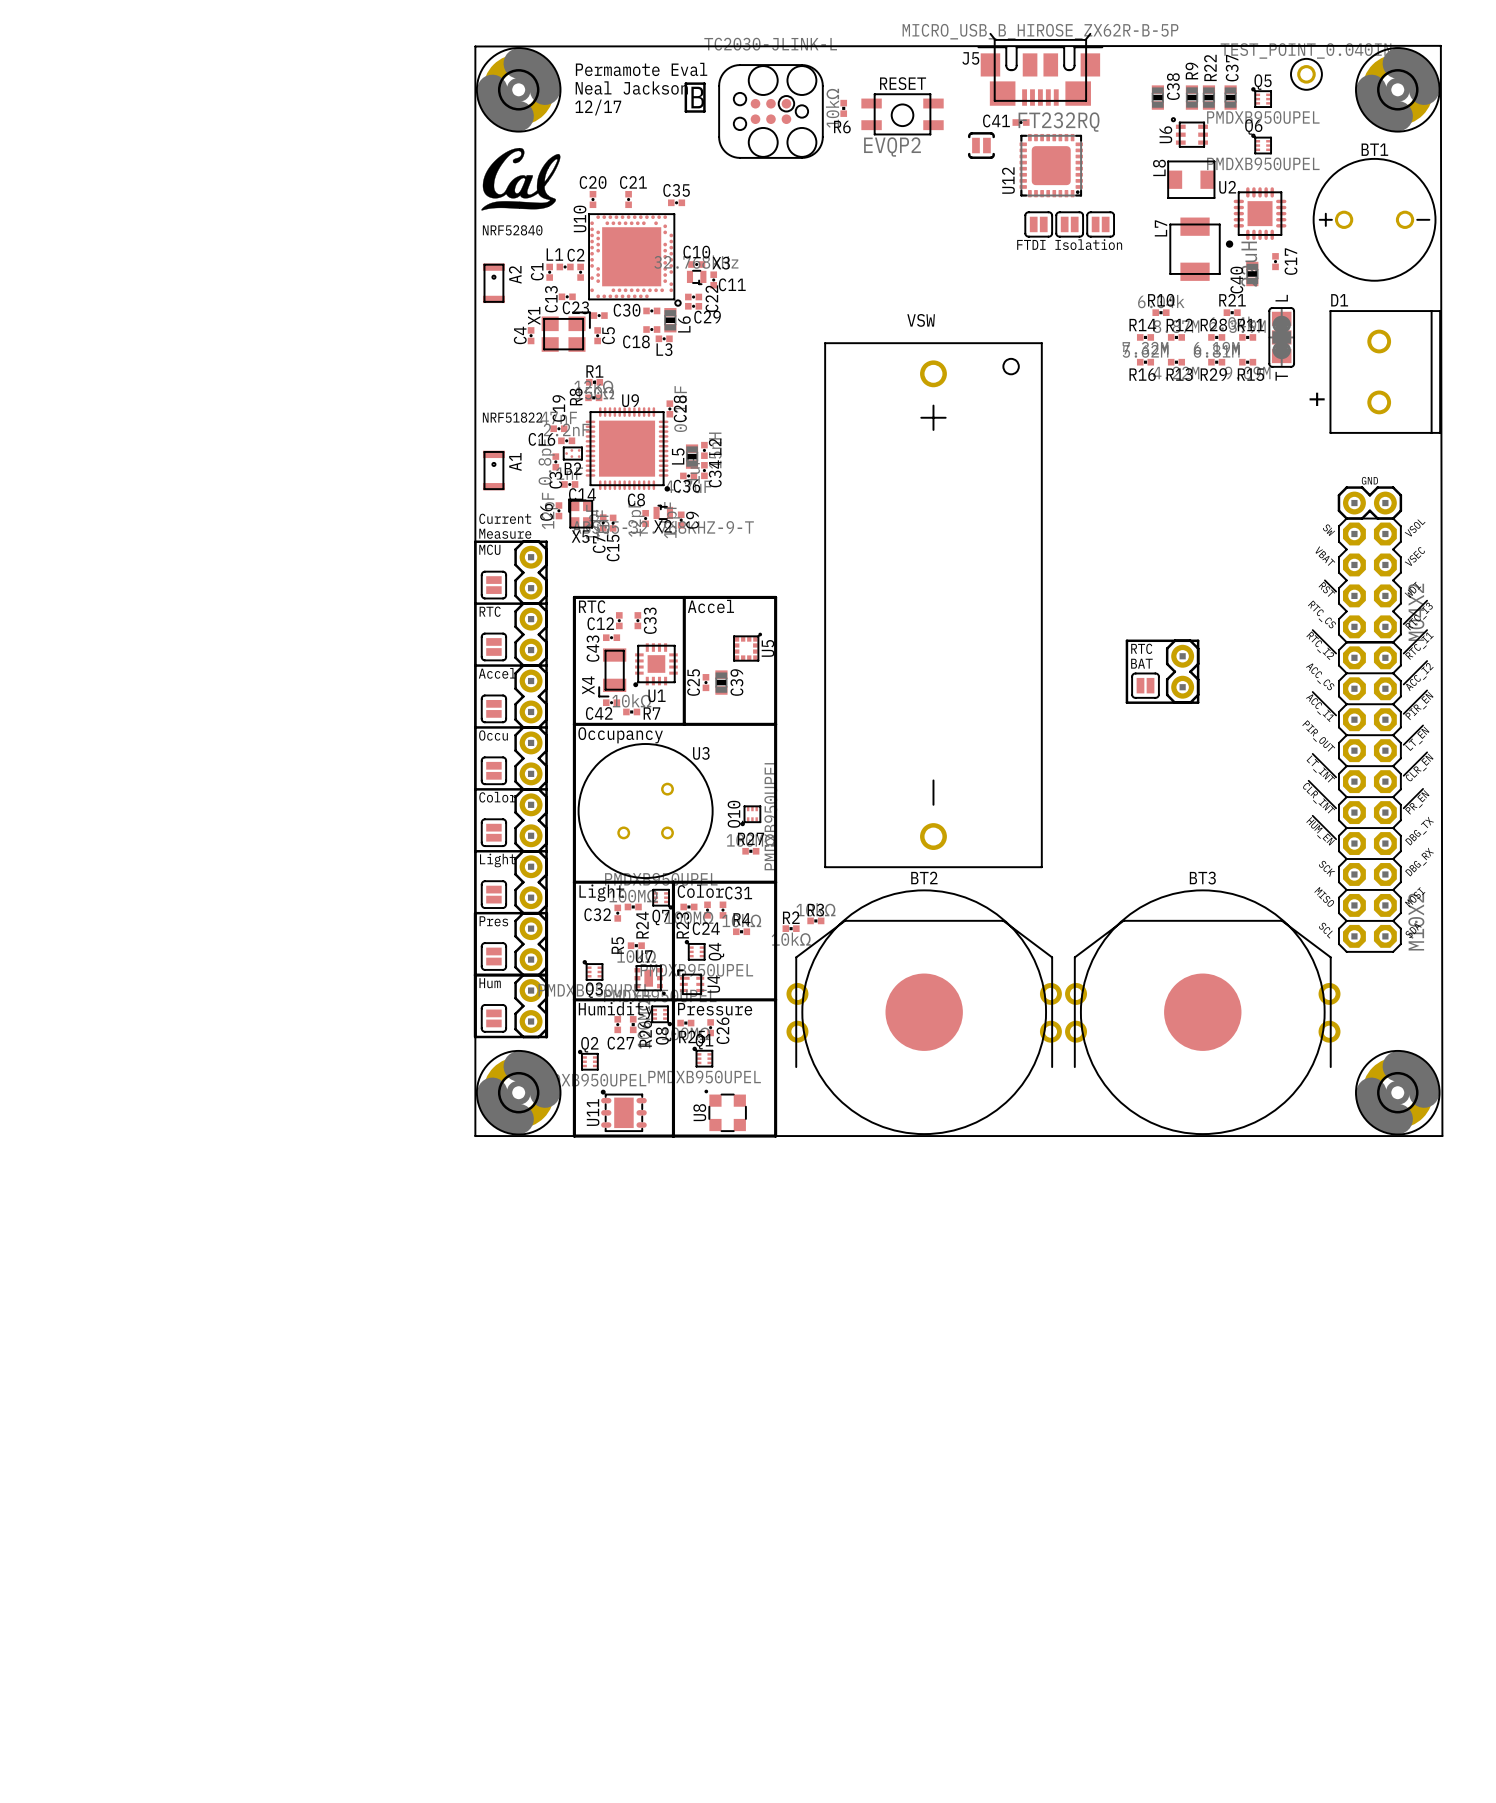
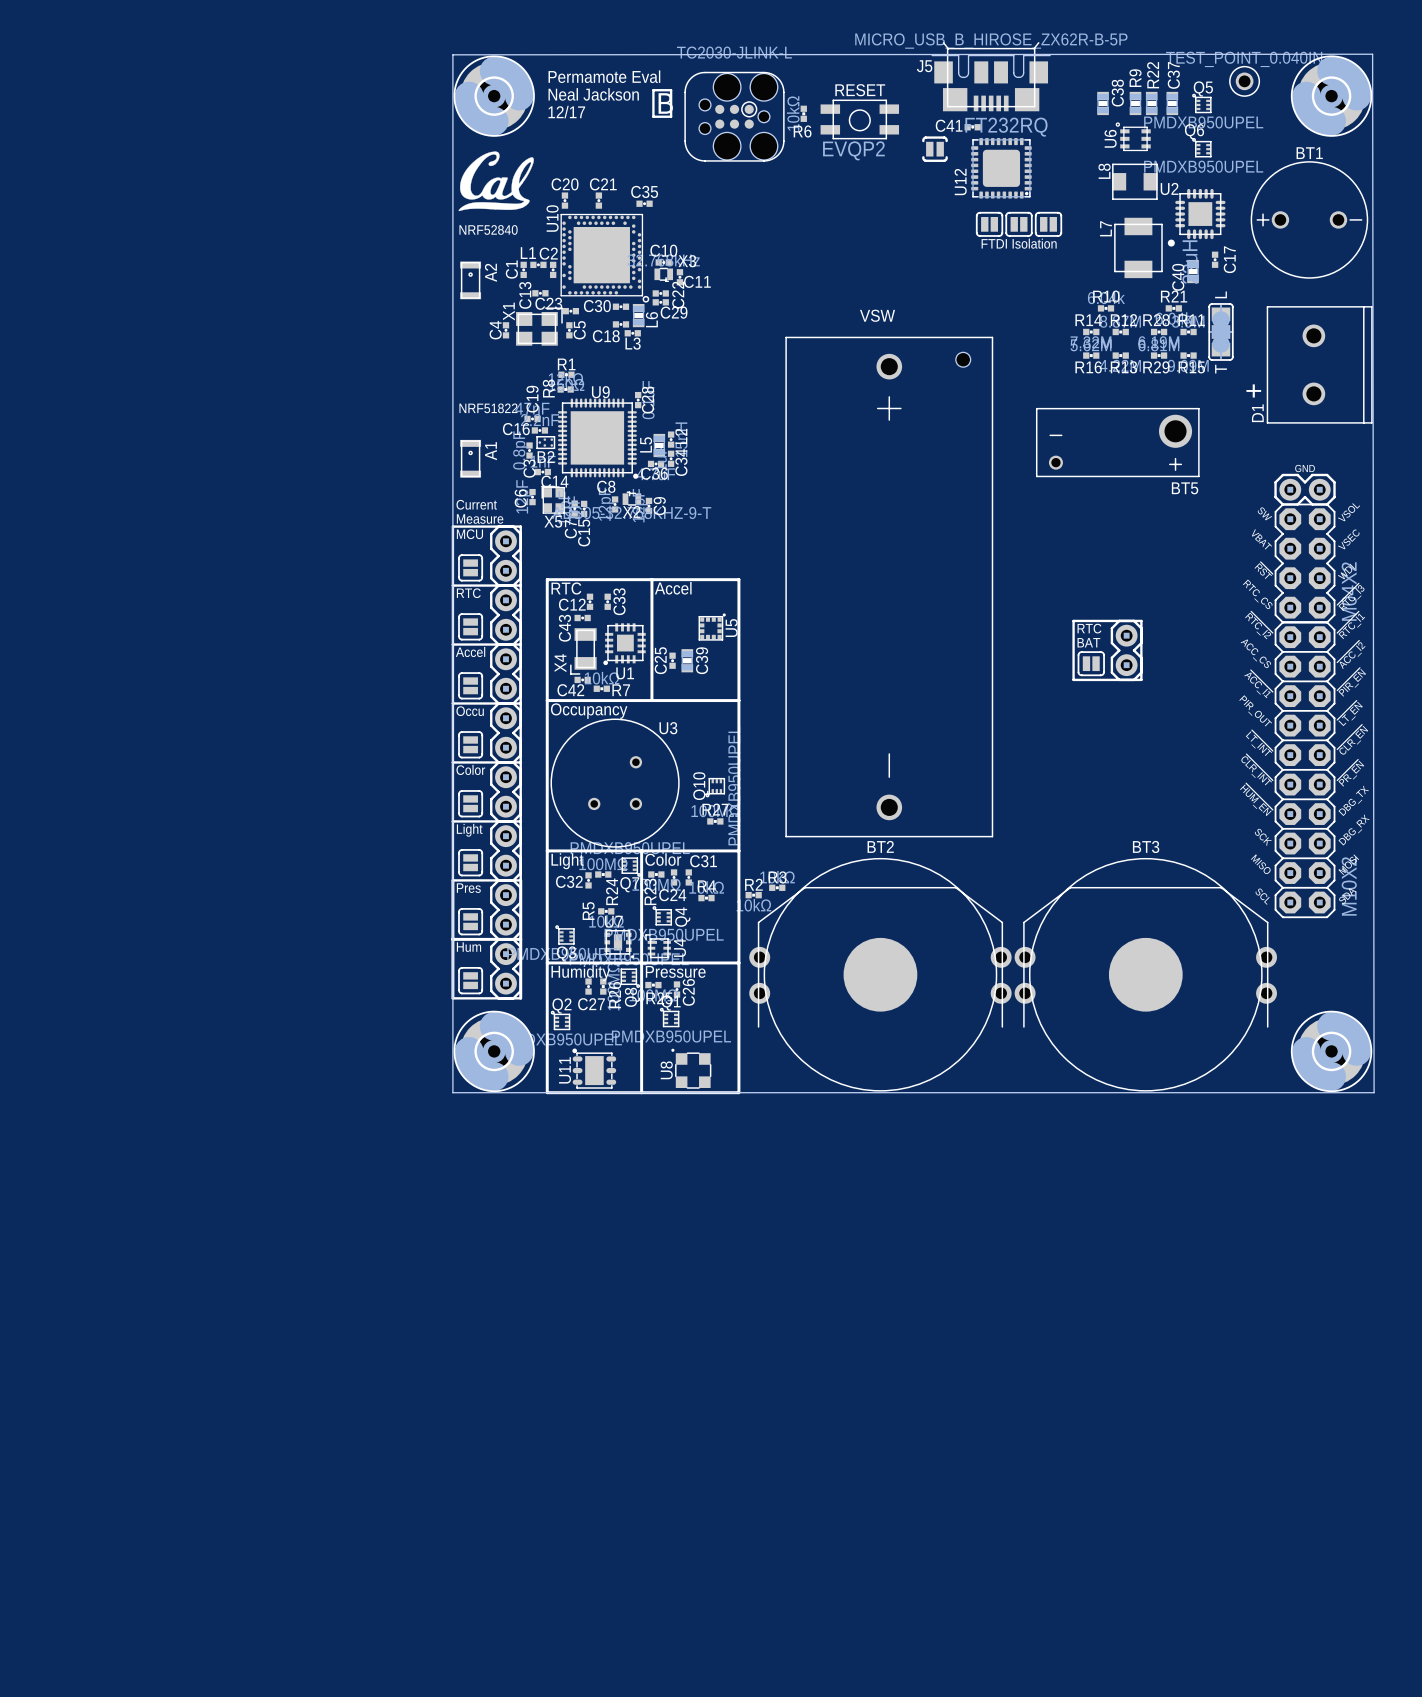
D1 name rotation: 0° (1339, 300) -> 90° counterclockwise (1257, 413)
D1 name position: D1 (1339, 300) -> D1 (1257, 413)
BT5: none -> (1117, 442)

